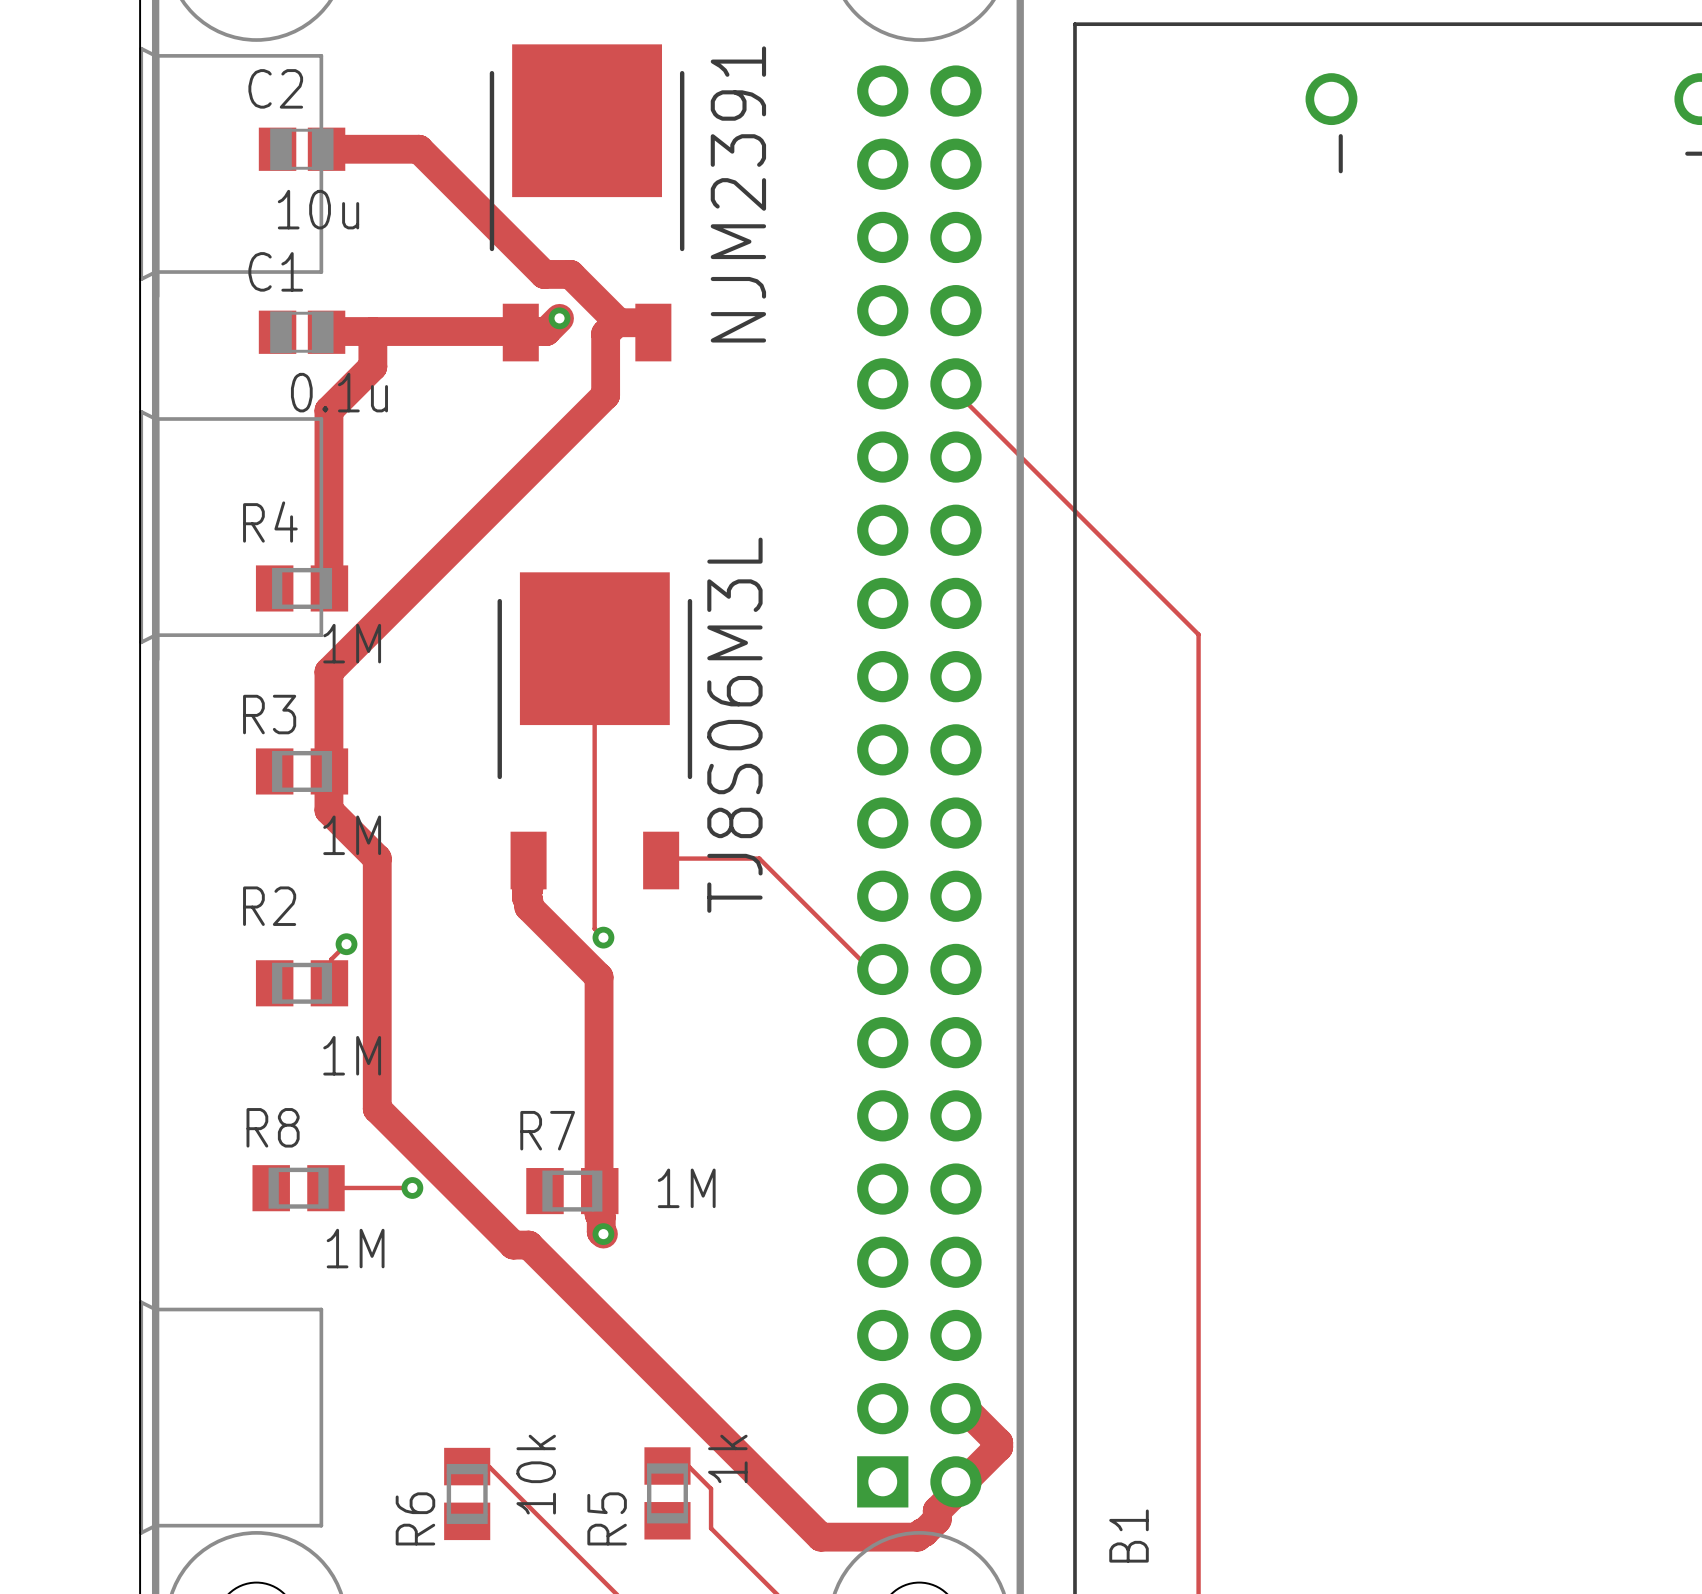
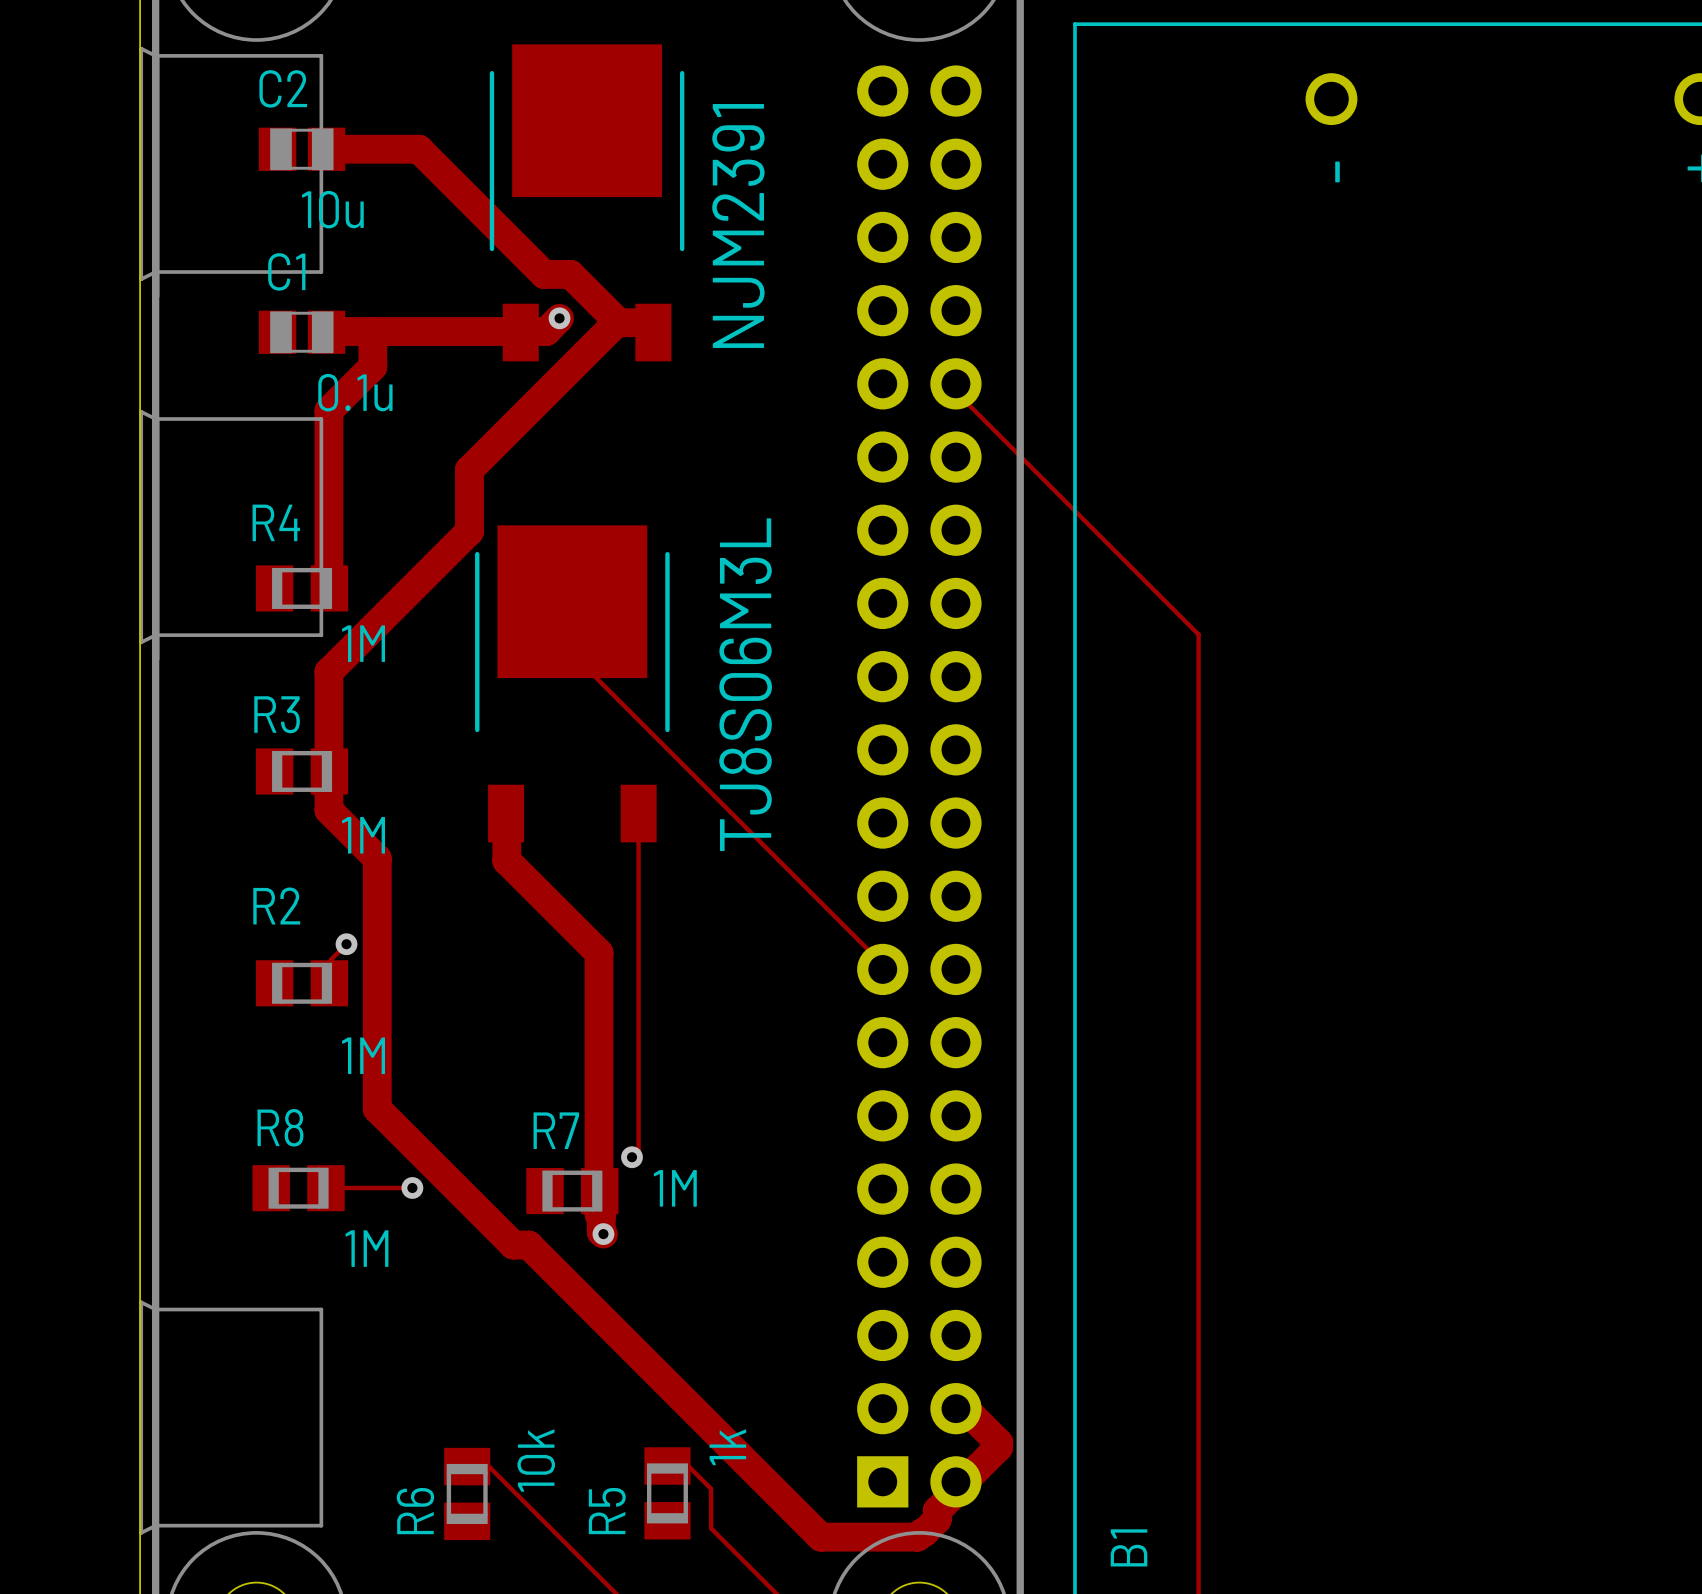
track: (605, 333) (605, 395) (469, 531) -> (605, 333) (469, 469) (469, 531)
track: (594, 648) (594, 928) (603, 937) -> none
part value position: TJ8S06M3L (734, 725) -> TJ8S06M3L (745, 684)
part position: (594, 730) -> (572, 683)
track: none -> (638, 813) (638, 1150) (631, 1157)
track: (528, 860) (528, 889) (526, 891) (528, 906) (599, 977) -> (506, 813) (506, 860) (599, 953) (599, 977)
track: (661, 860) (662, 858) (759, 858) (869, 968) (882, 968) -> (572, 601) (572, 654) (882, 963) (882, 968)
via: (603, 937) -> none
via: none -> (631, 1157)

